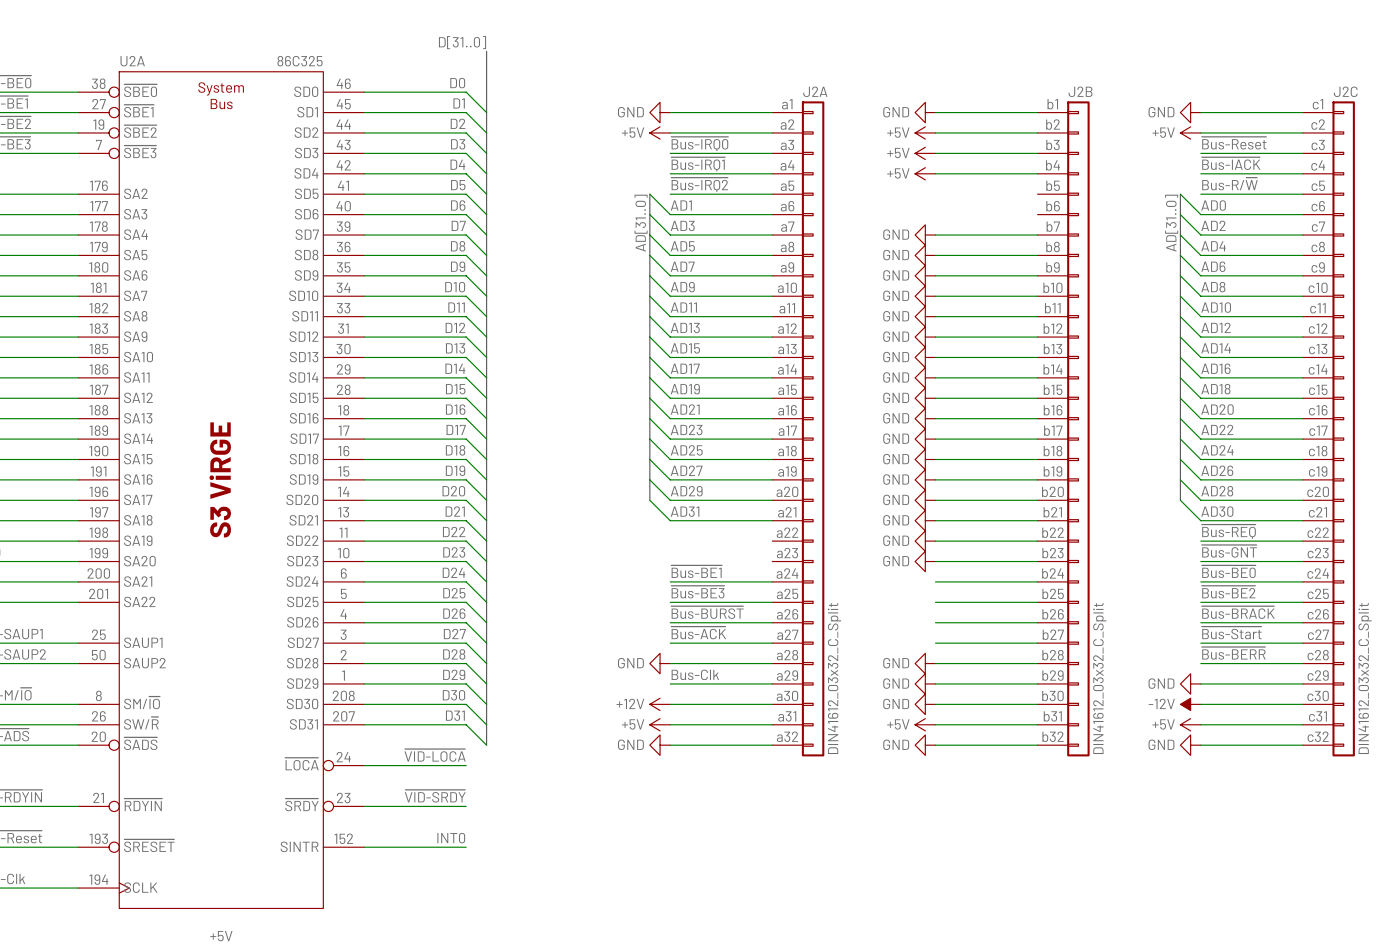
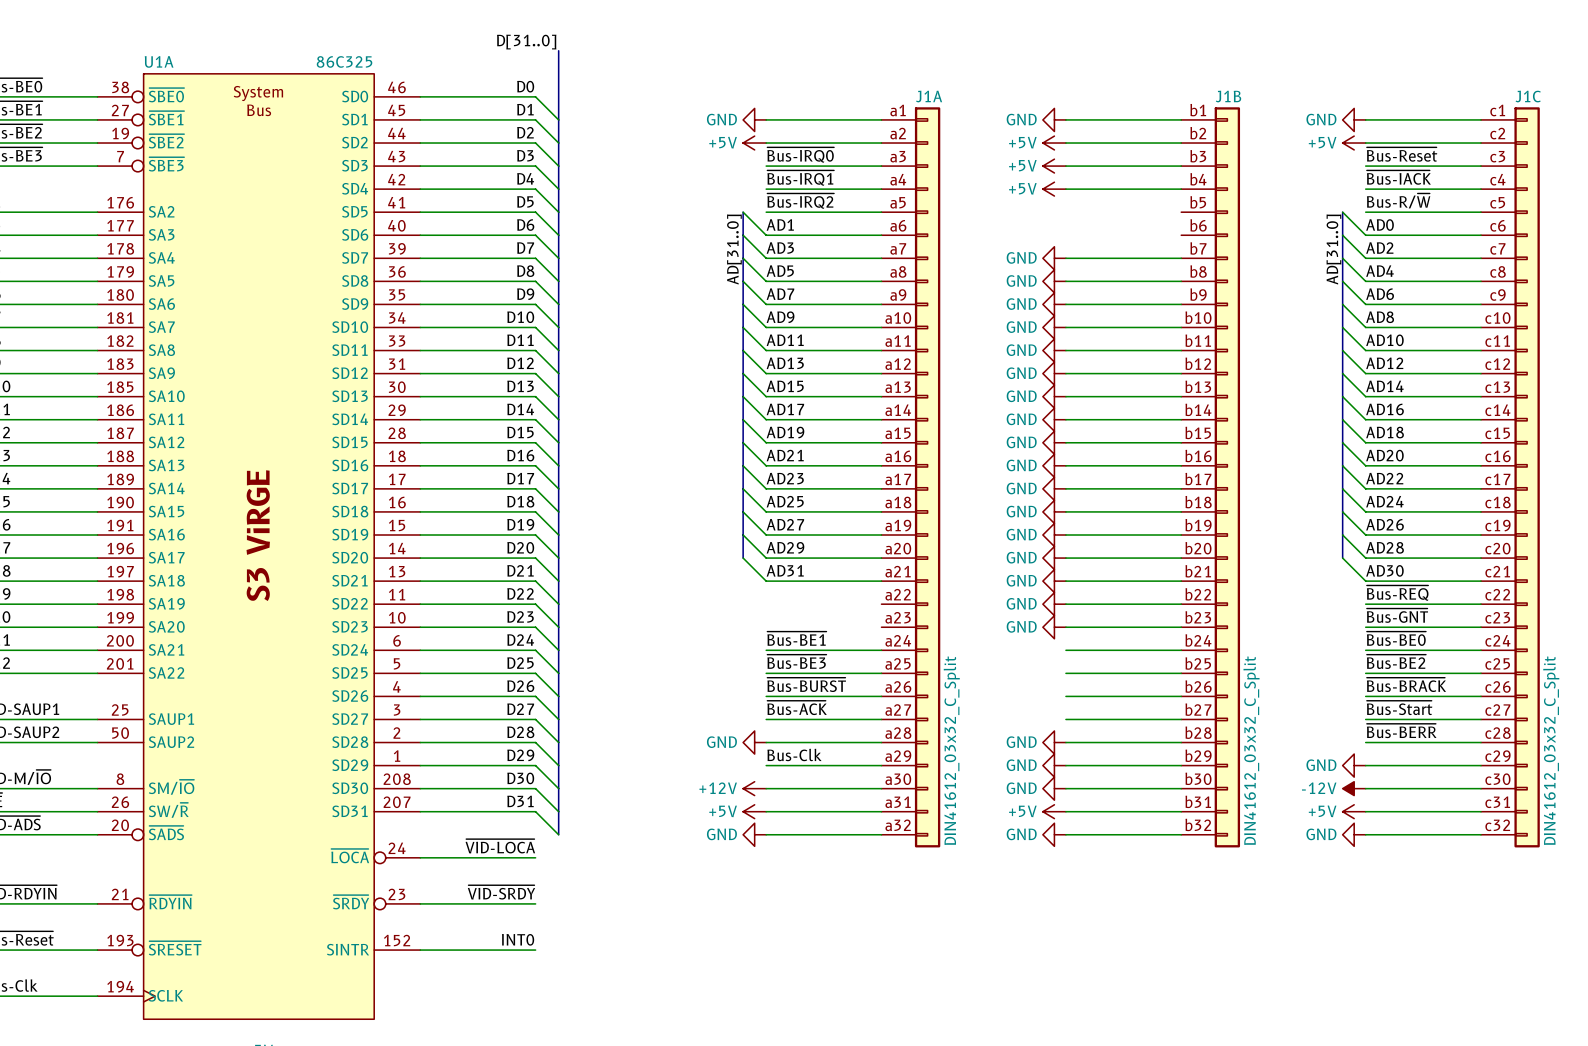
U2A name: U2A (132, 61) -> U1A (159, 61)
J2A name: J2A (815, 91) -> J1A (929, 96)
J2B name: J2B (1080, 91) -> J1B (1228, 96)
J2C name: J2C (1345, 91) -> J1C (1528, 96)

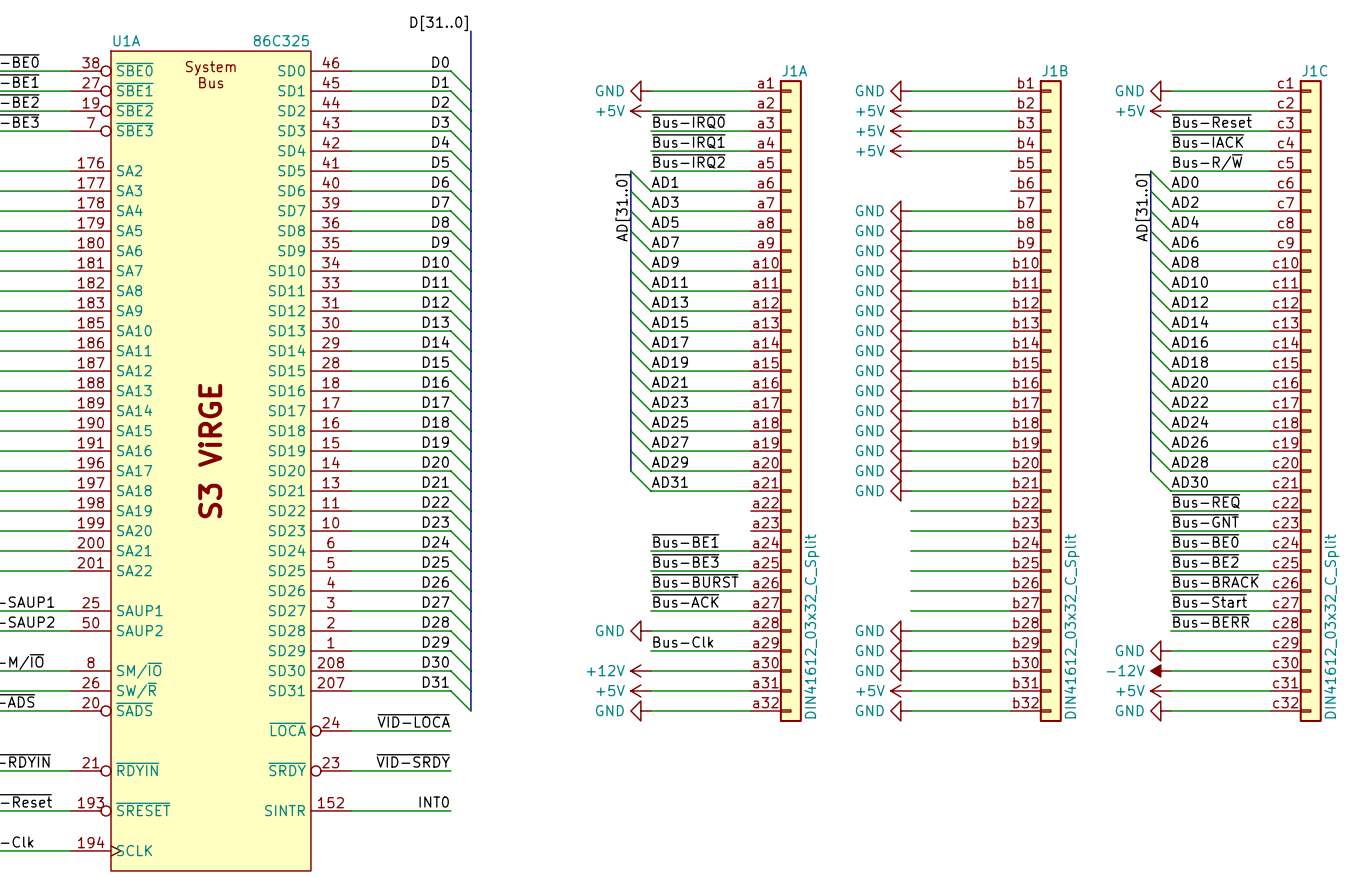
power symbol: GND (1054, 604) -> none
power symbol: GND (1054, 627) -> none

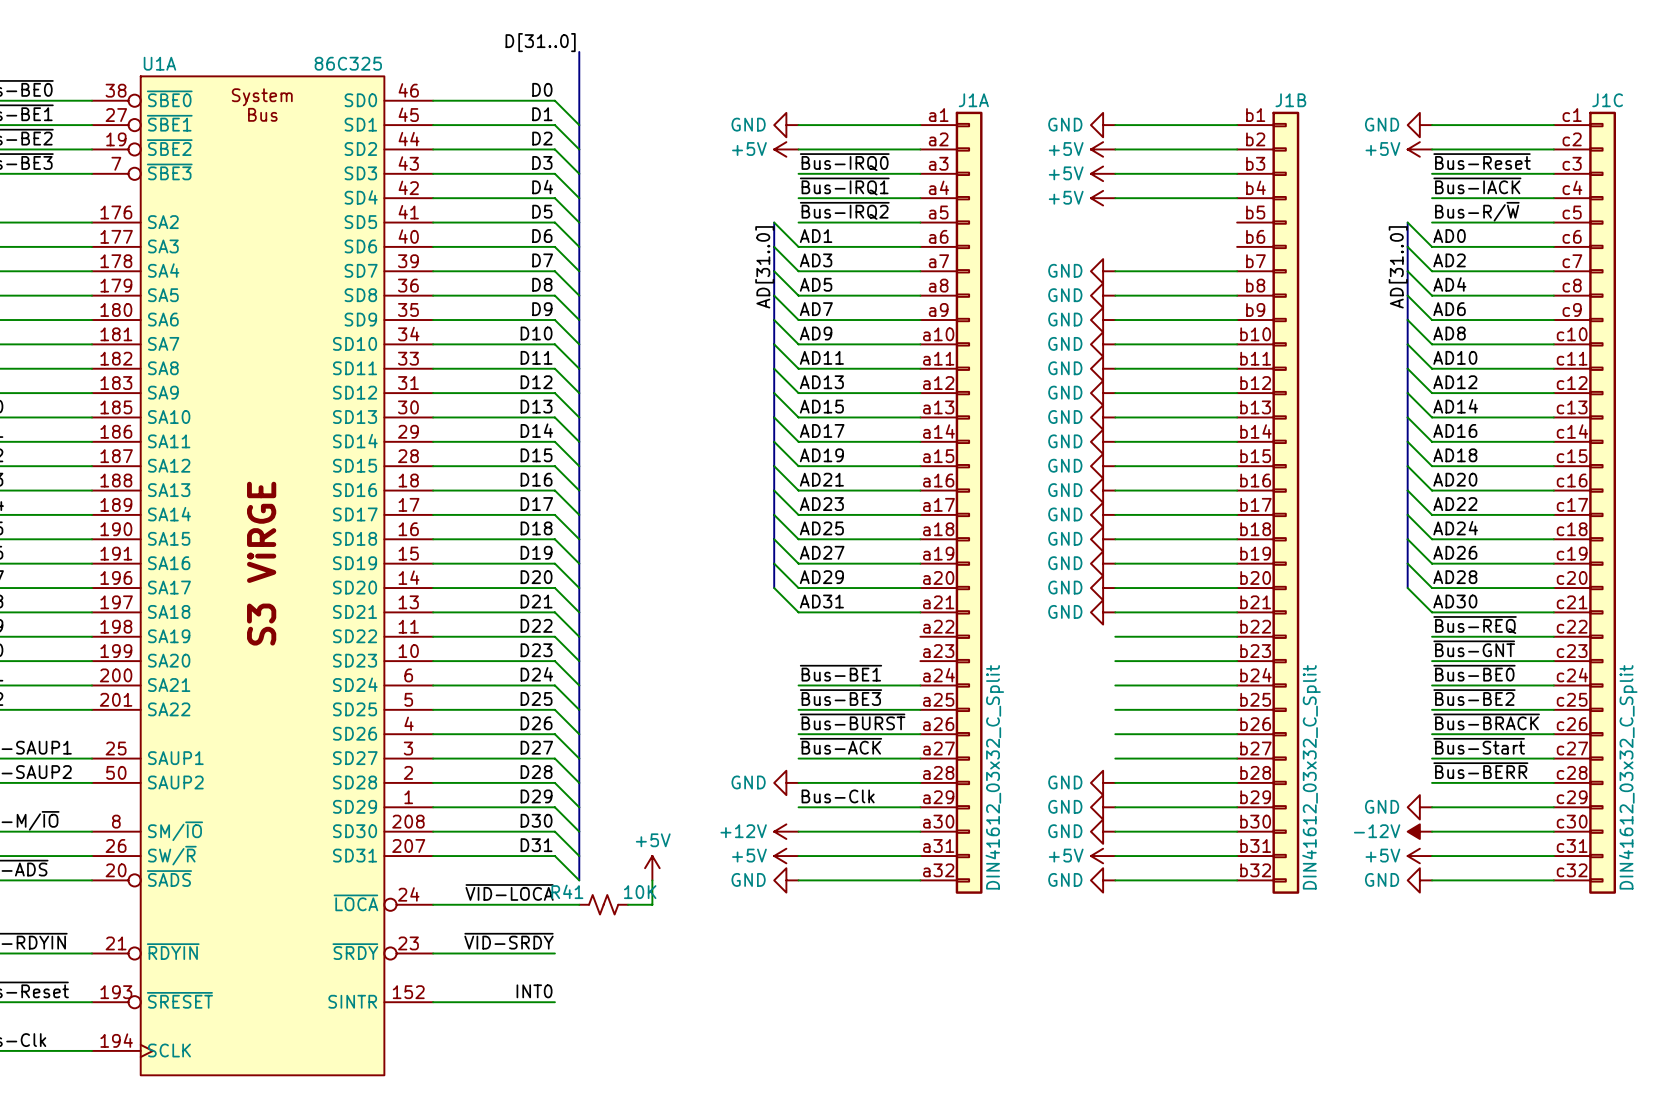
power symbol: none -> +5V (652, 868)
wire: none -> (652, 880) (652, 904) (628, 904)
wire: none -> (554, 904) (579, 904)
R41: none -> 10K (603, 904)

